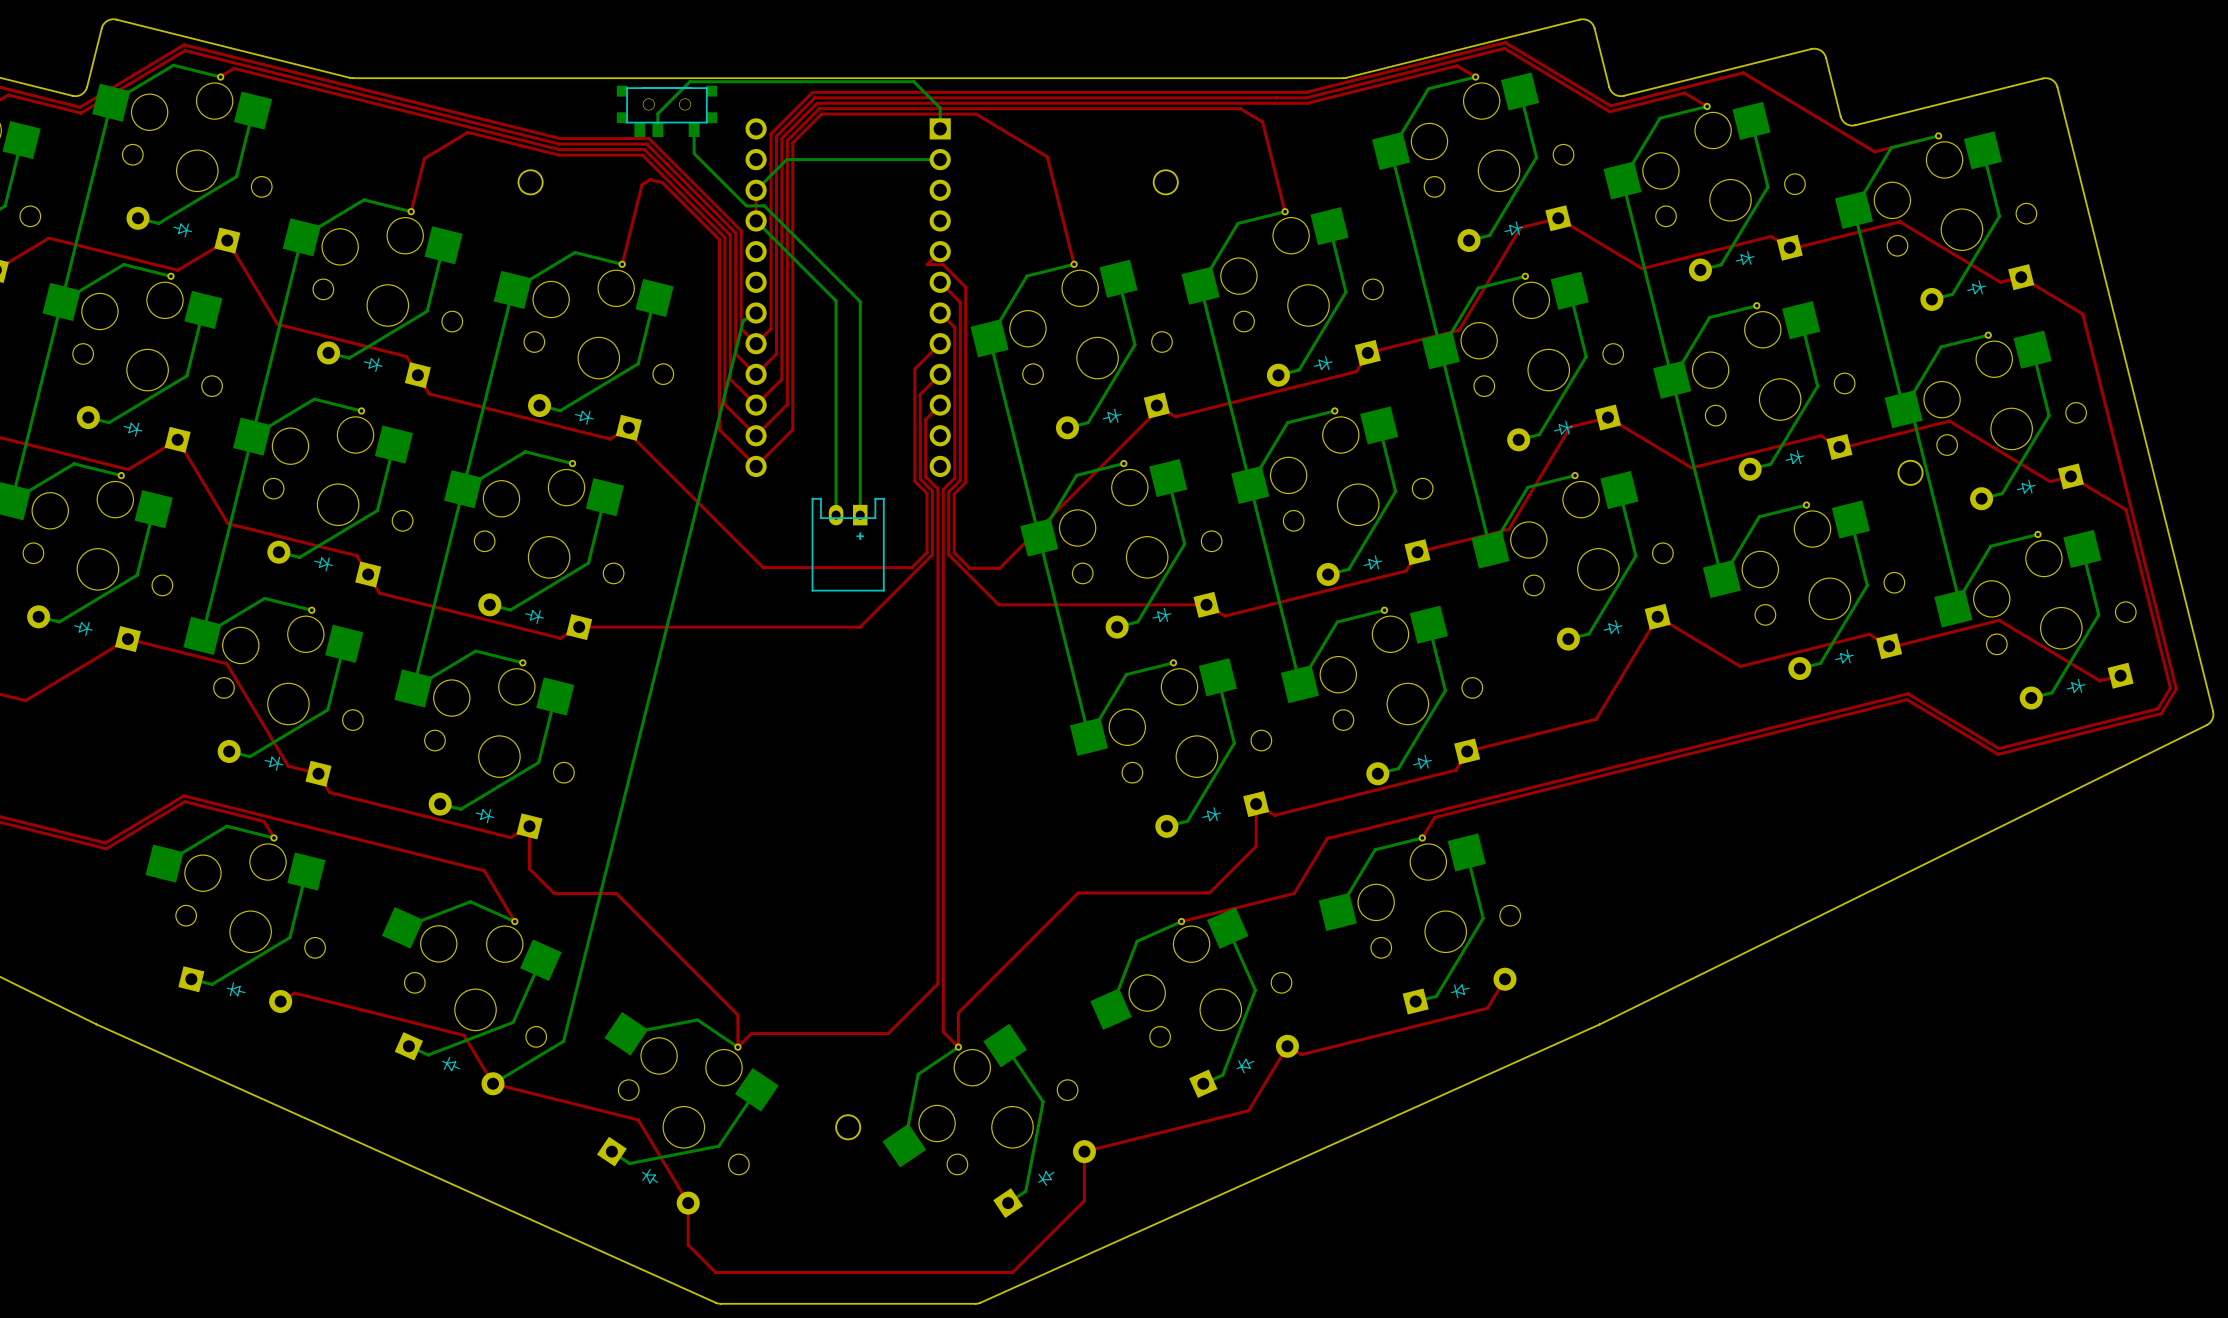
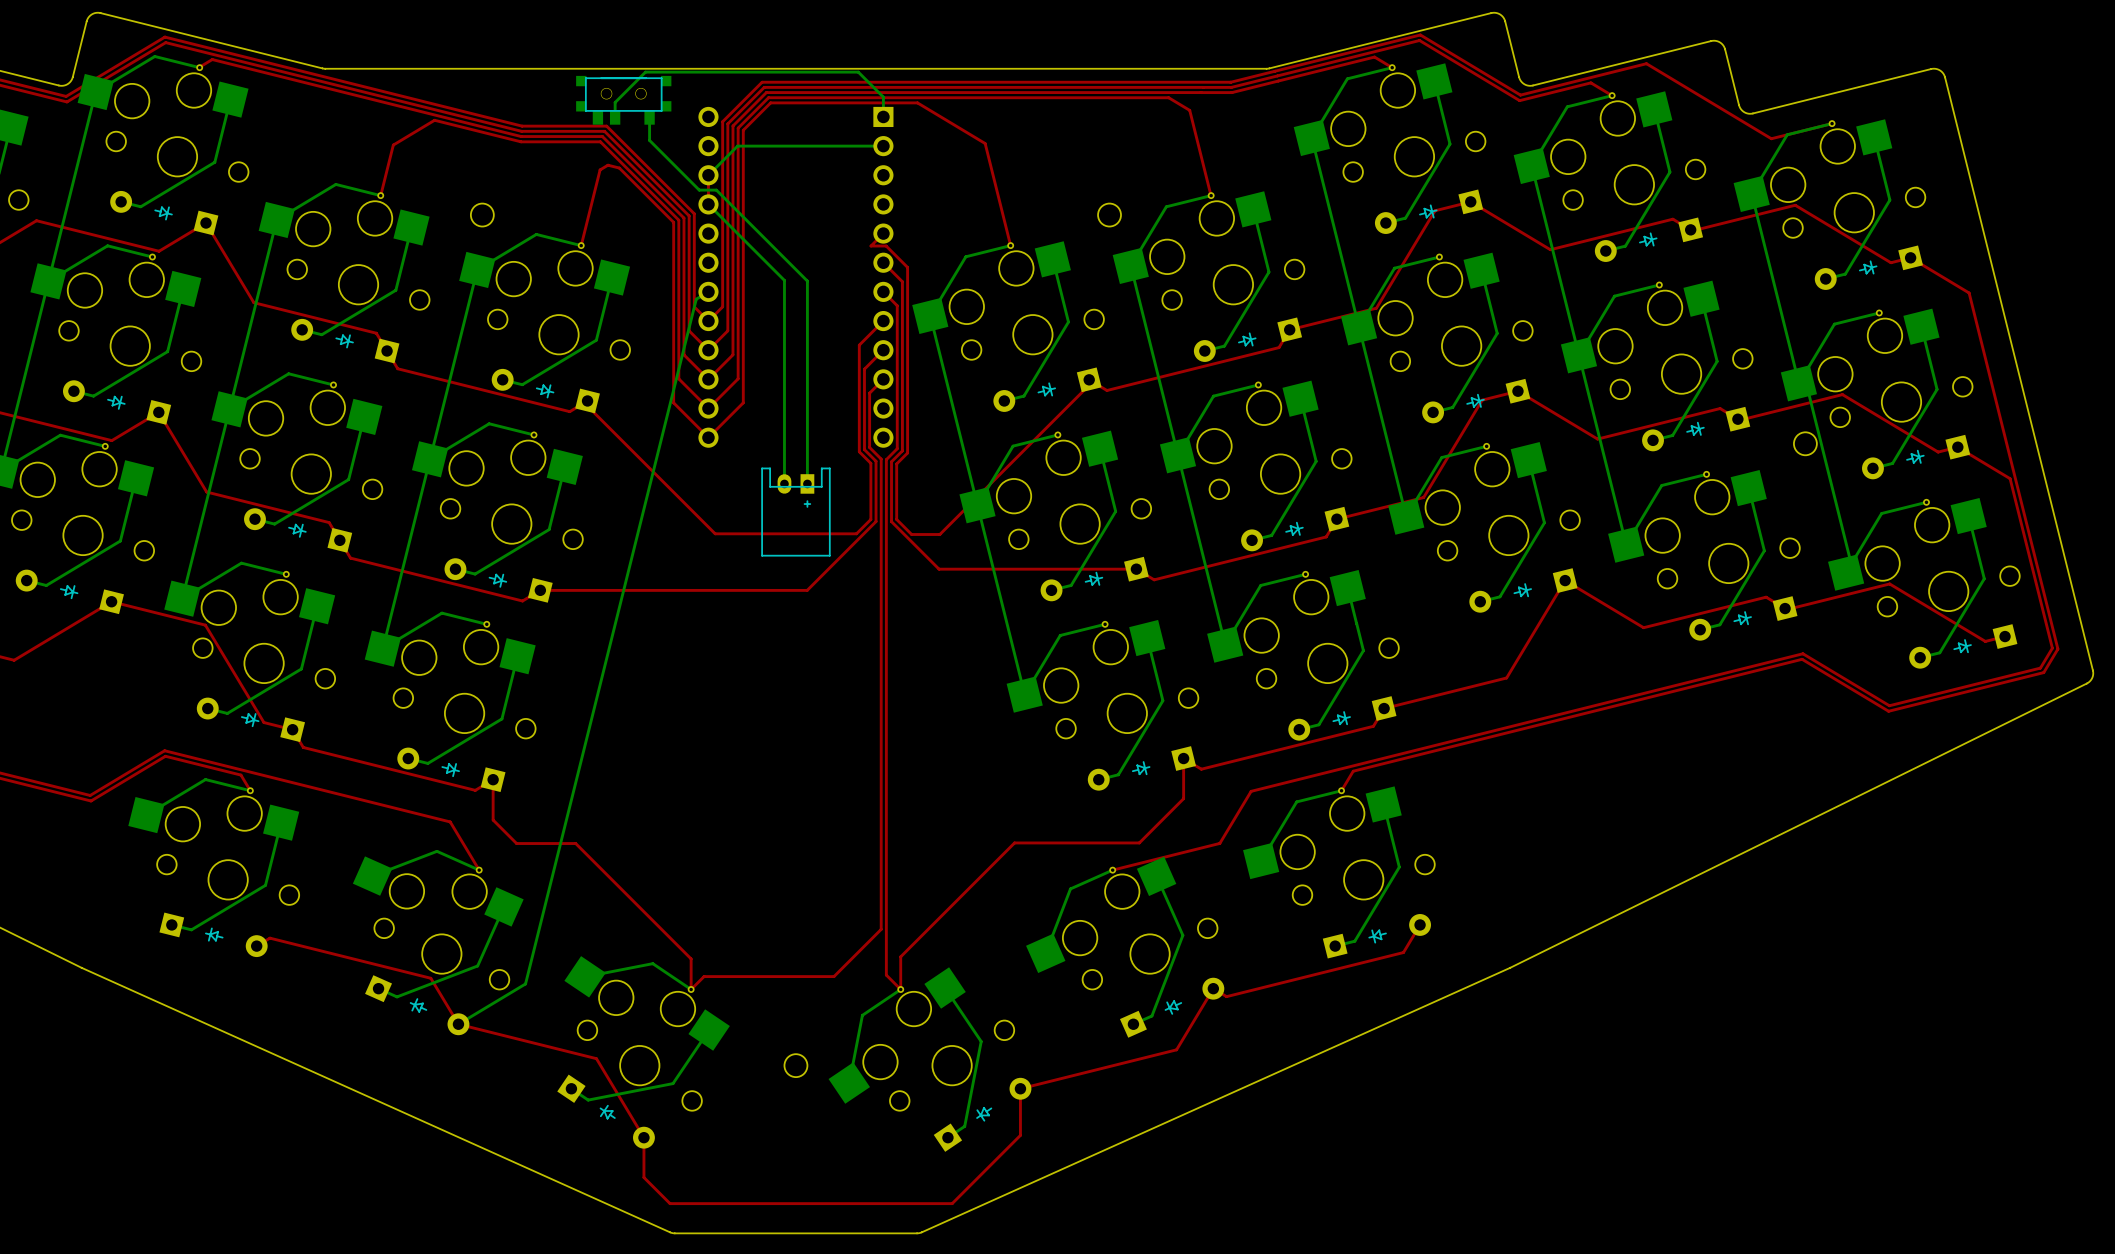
round board edge position: (530, 182) -> (482, 215)
round board edge position: (1165, 182) -> (1109, 215)

